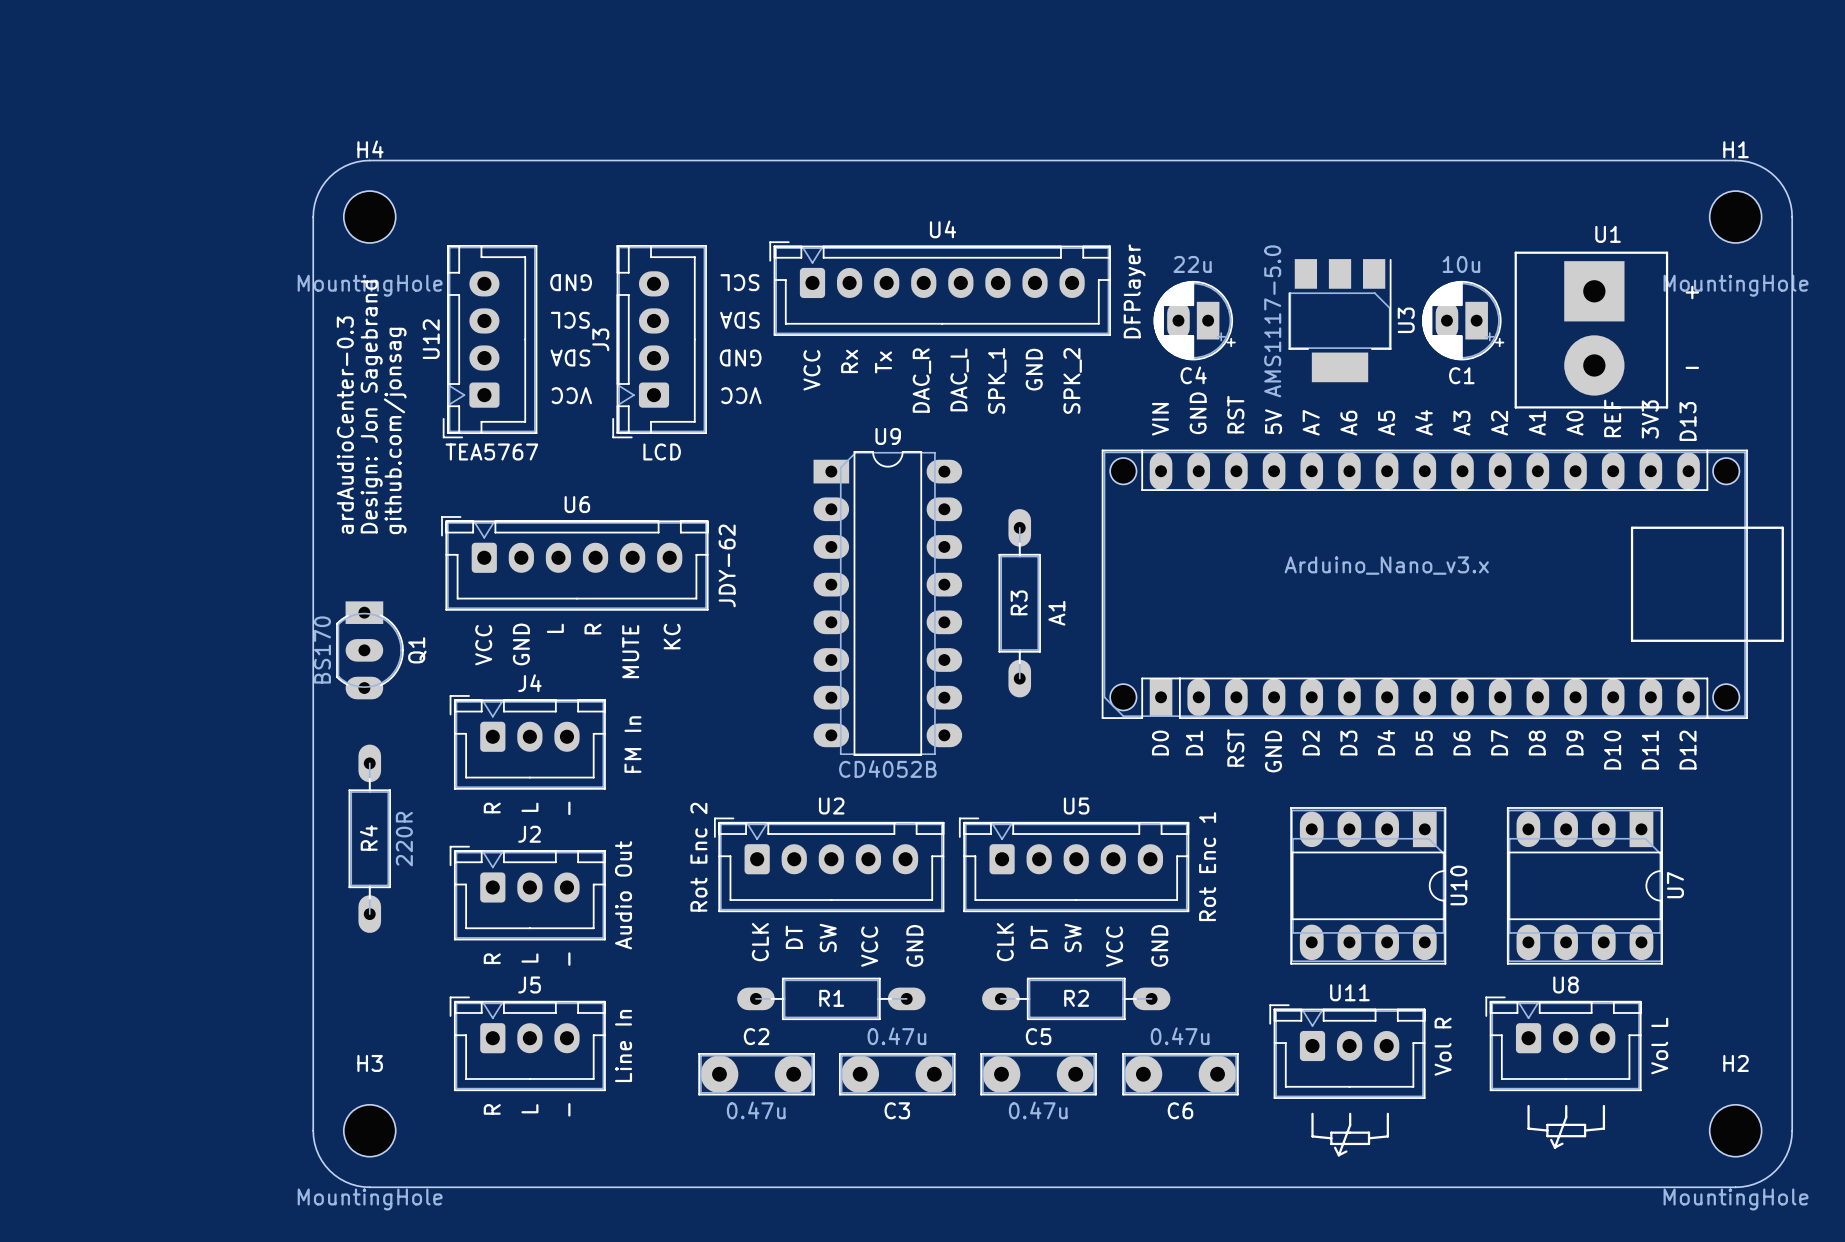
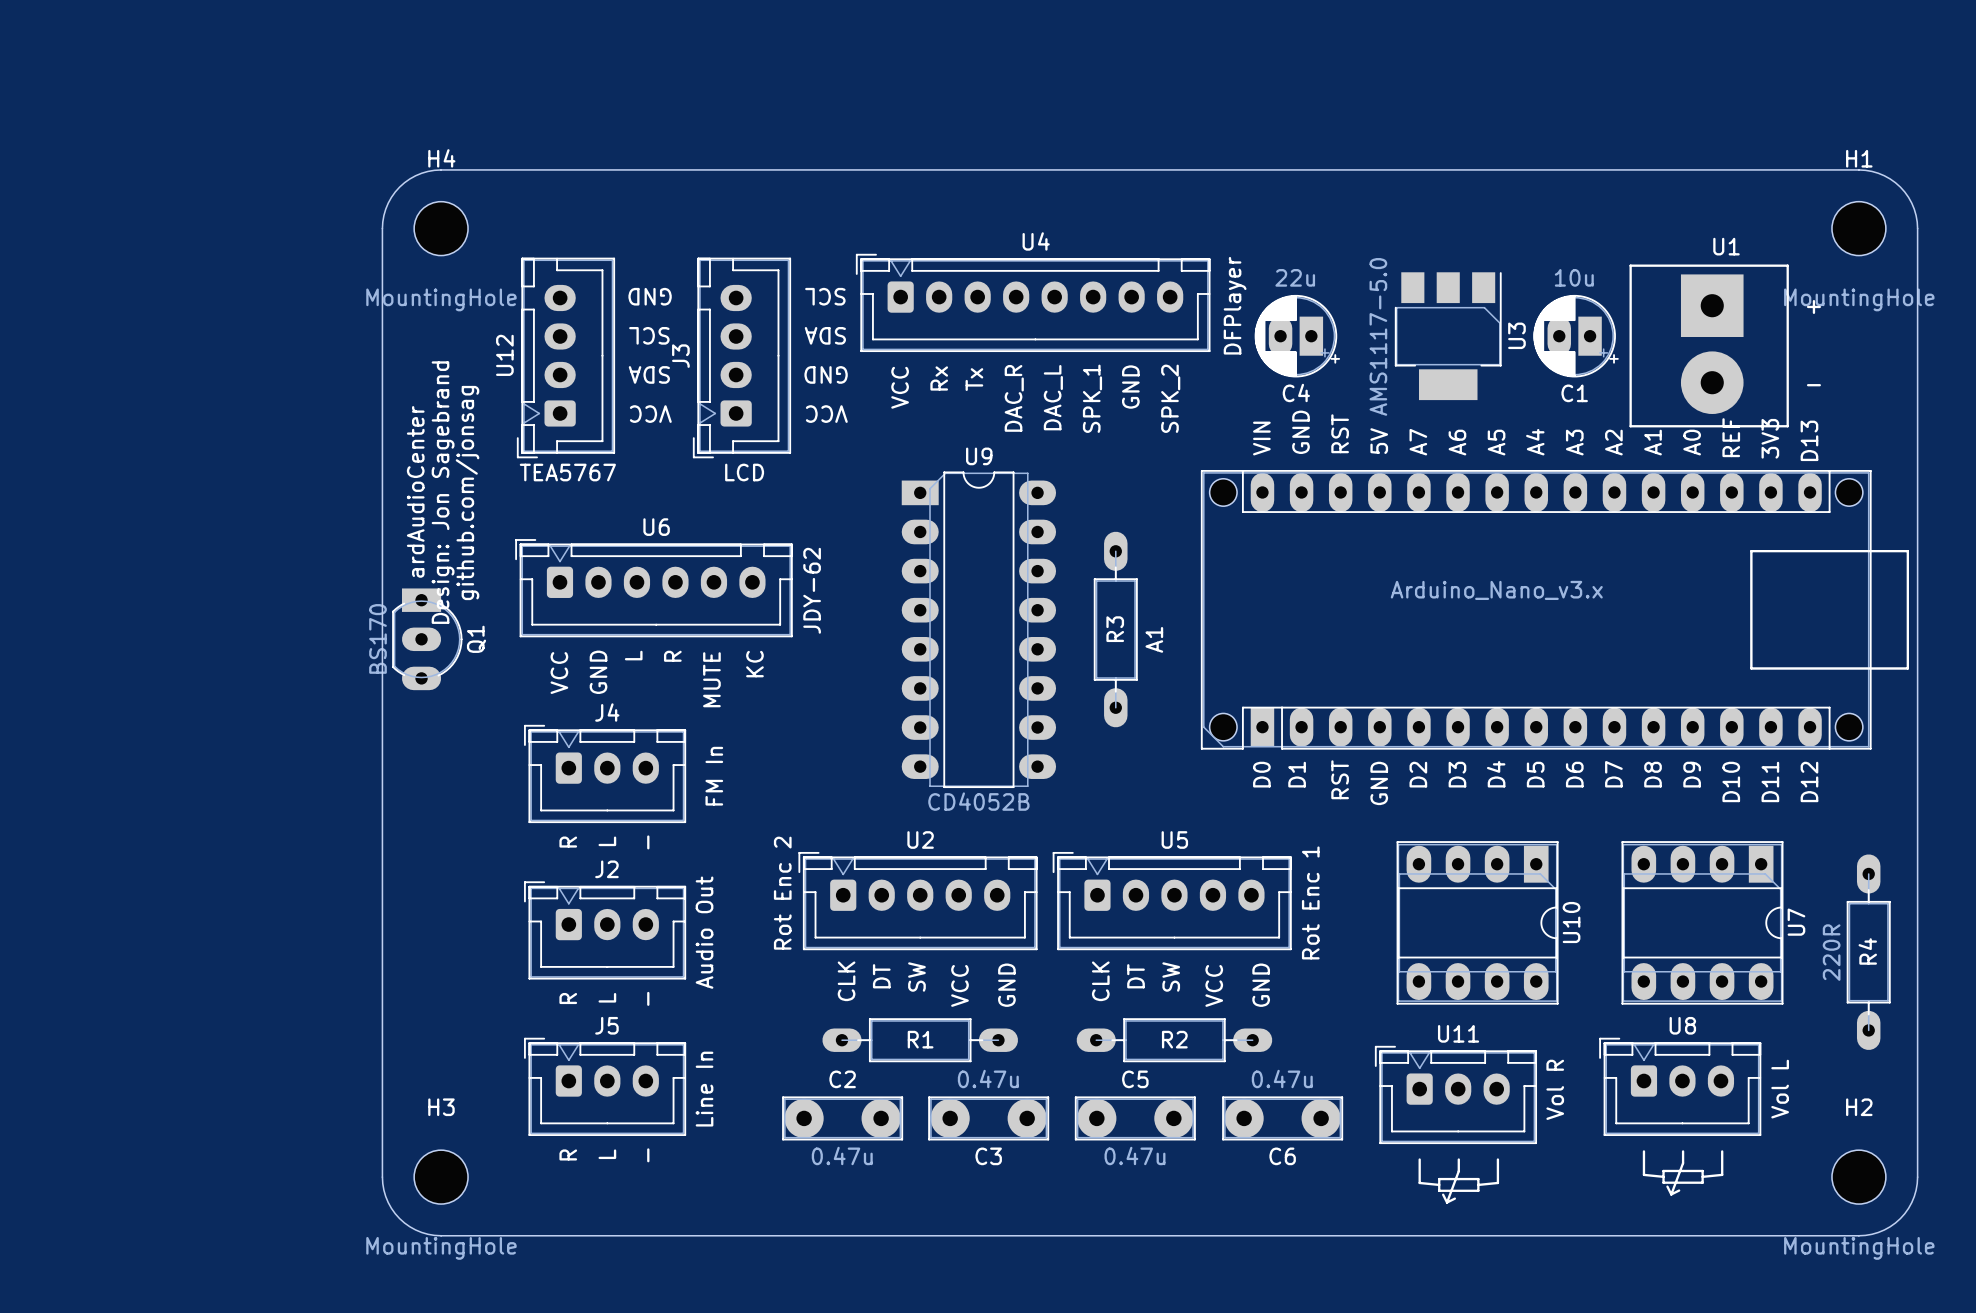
text position: Design: Jon Sagebrand (371, 406) -> Design: Jon Sagebrand (443, 492)
text: ardAudioCenter-0.3 (345, 425) -> ardAudioCenter (415, 491)
text position: github.com/jonsag (395, 430) -> github.com/jonsag (467, 493)
Q1 position: (369, 650) -> (427, 639)
R4 position: (369, 838) -> (1868, 952)
R4 value position: 220R (404, 839) -> 220R (1831, 952)

